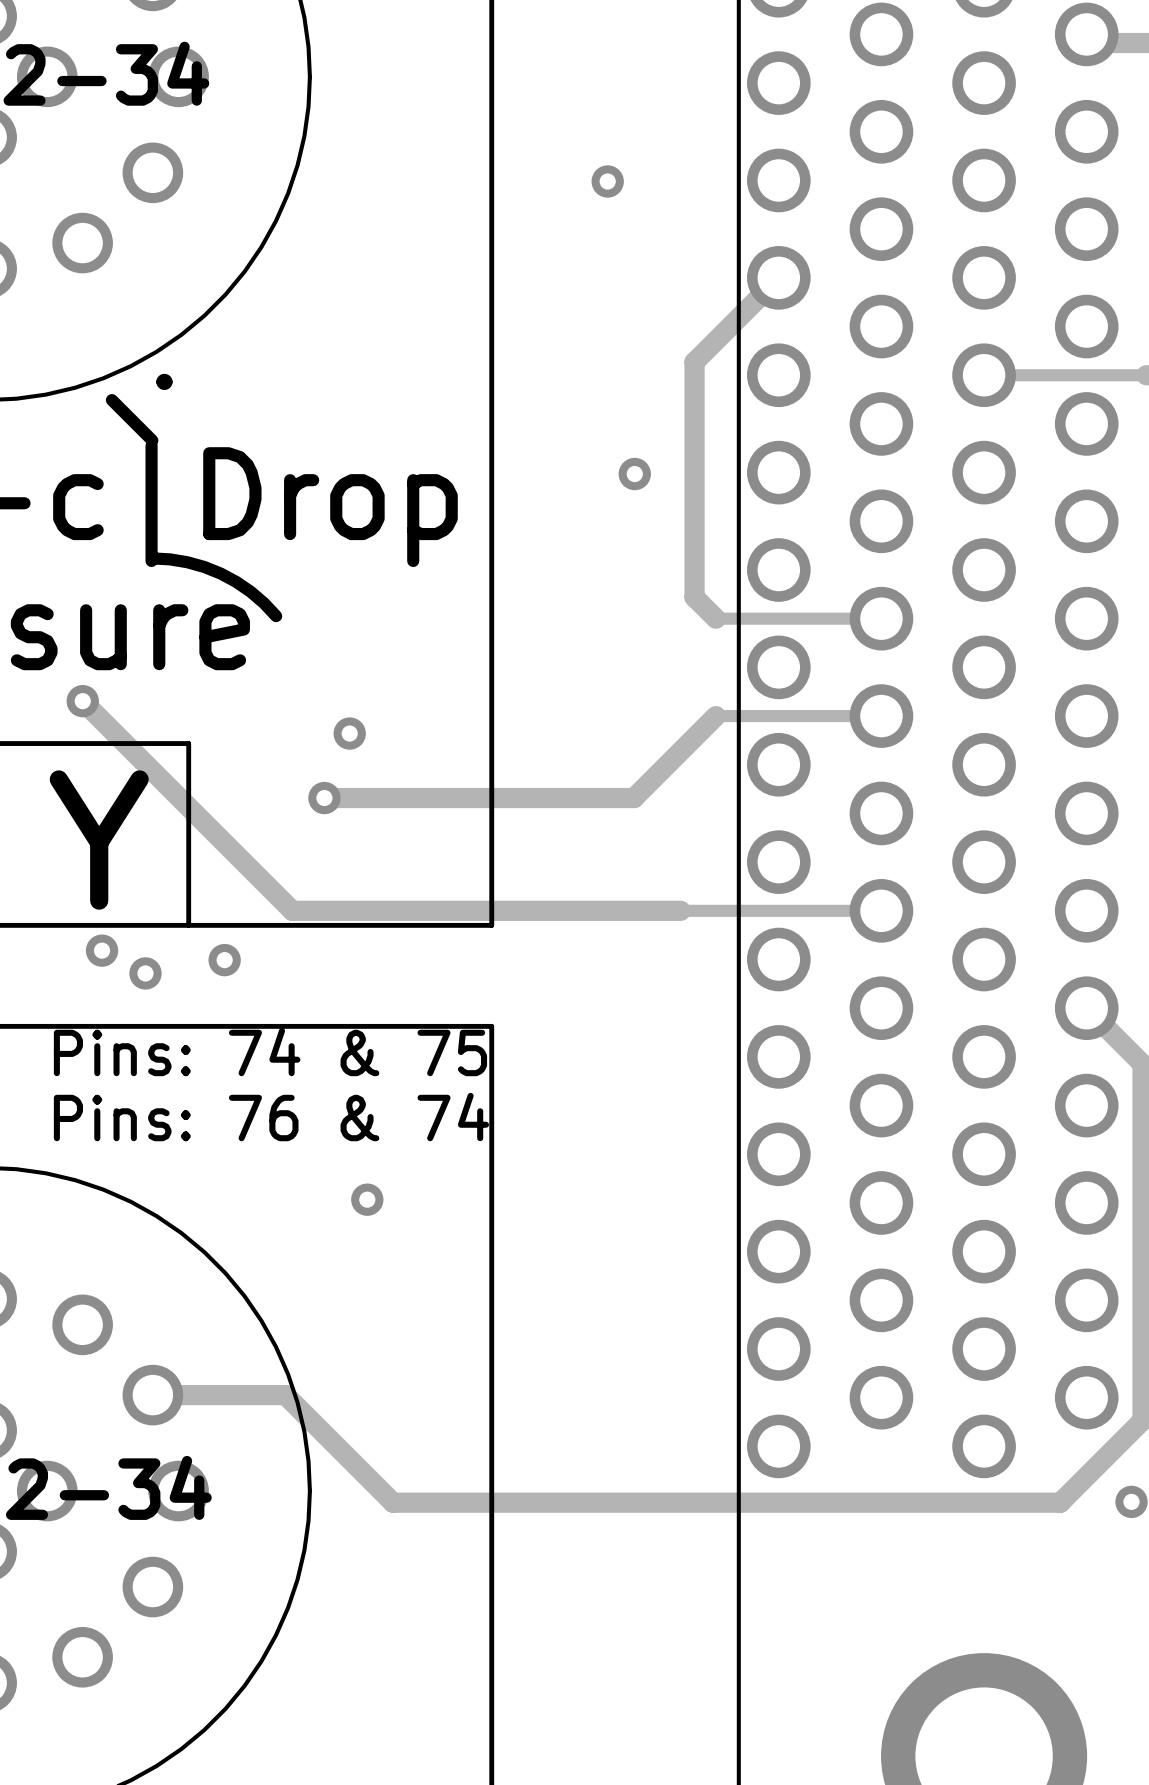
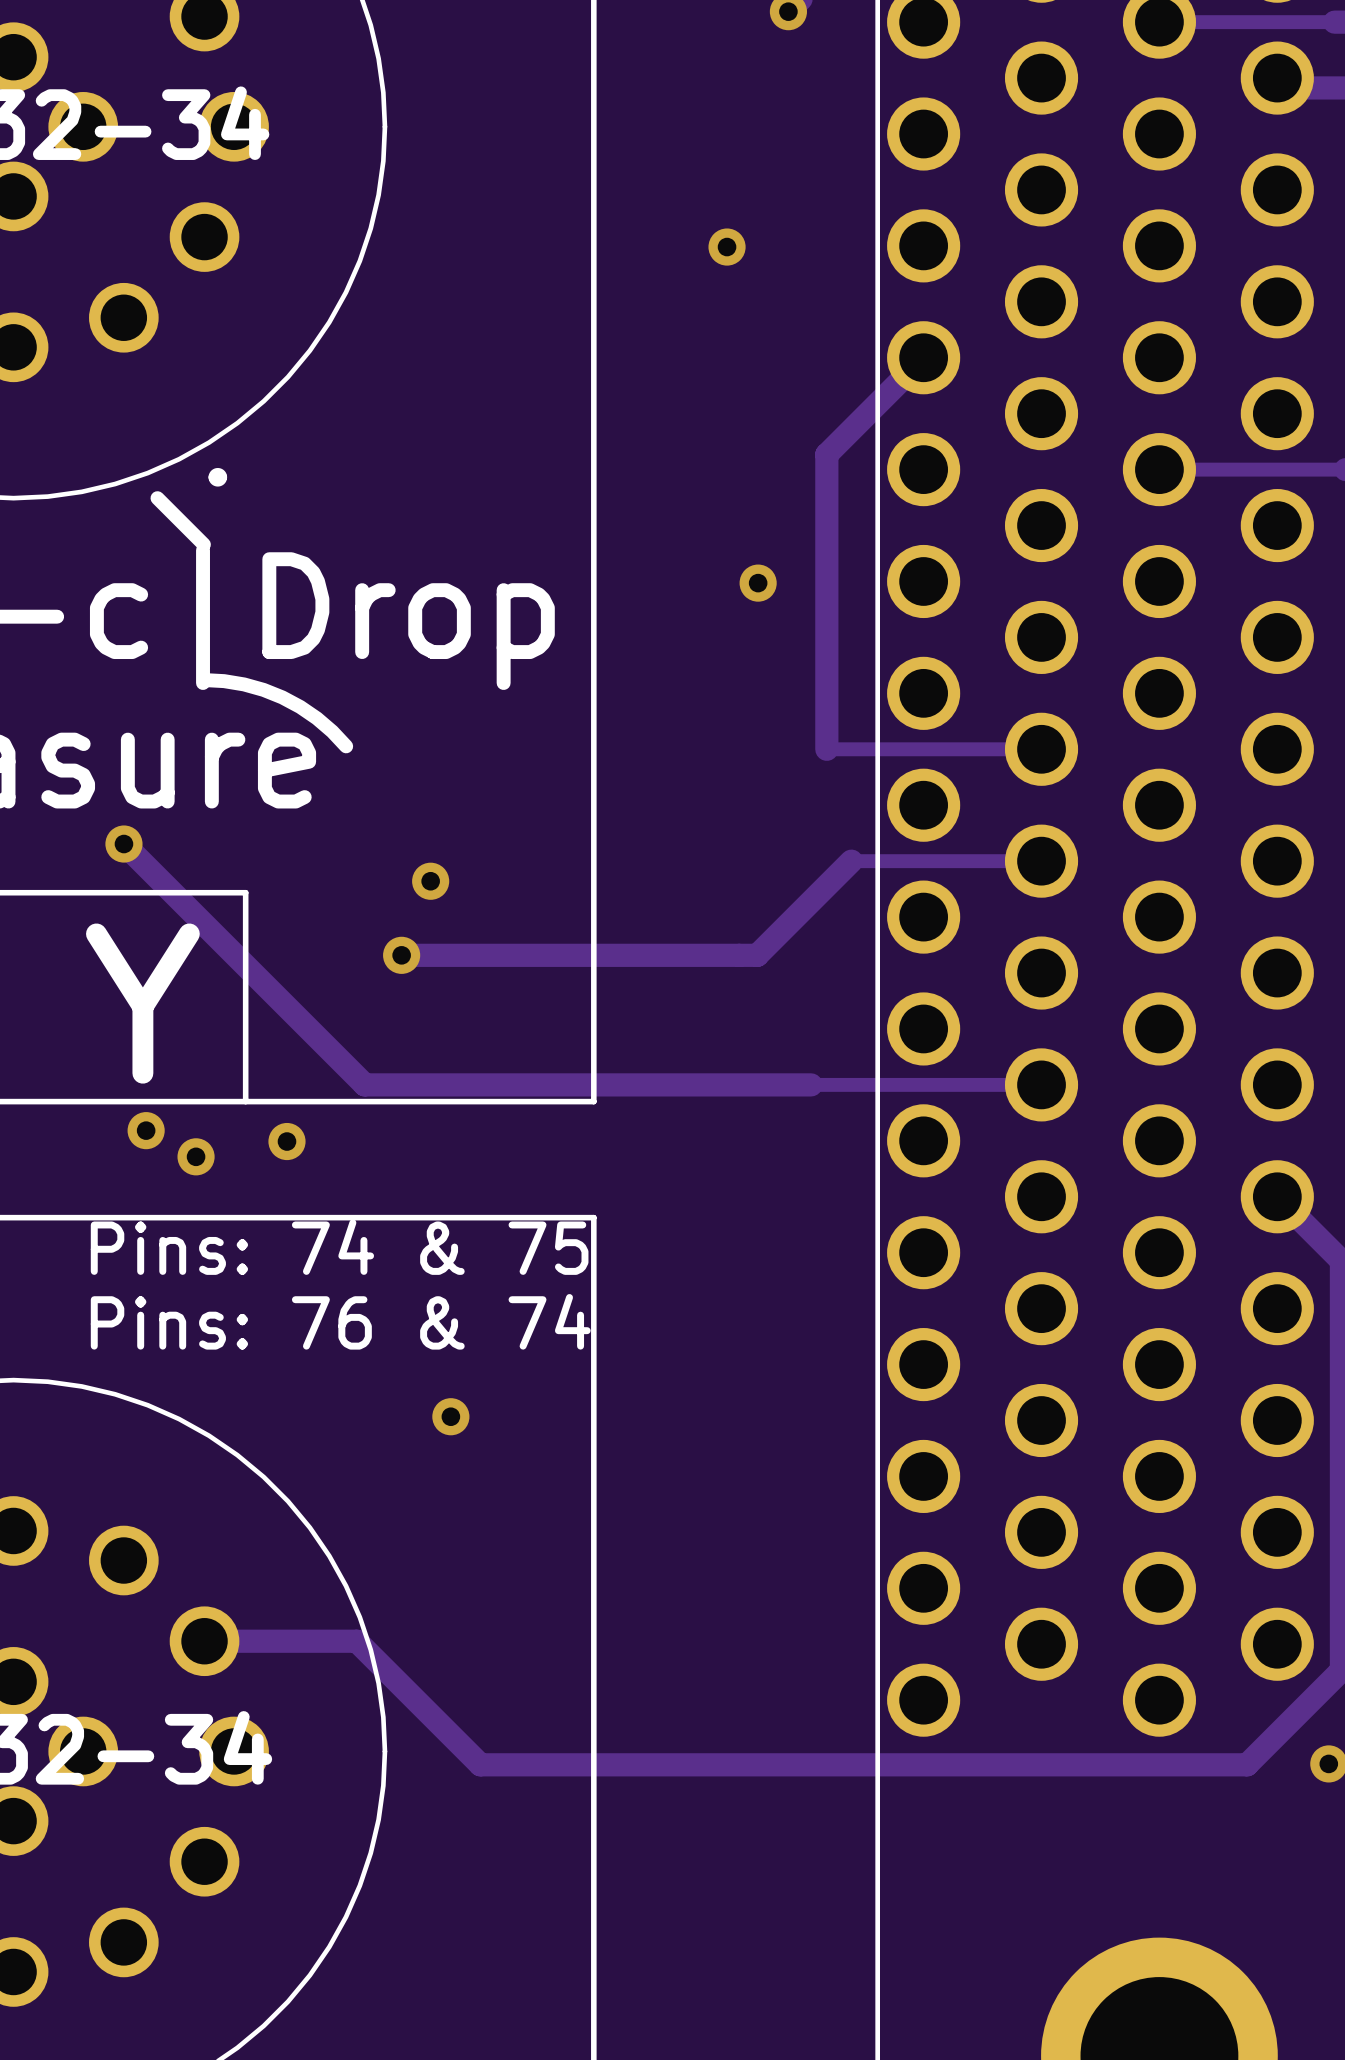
track: (694, 597) (715, 618) -> (826, 724) (826, 749) (851, 749)

